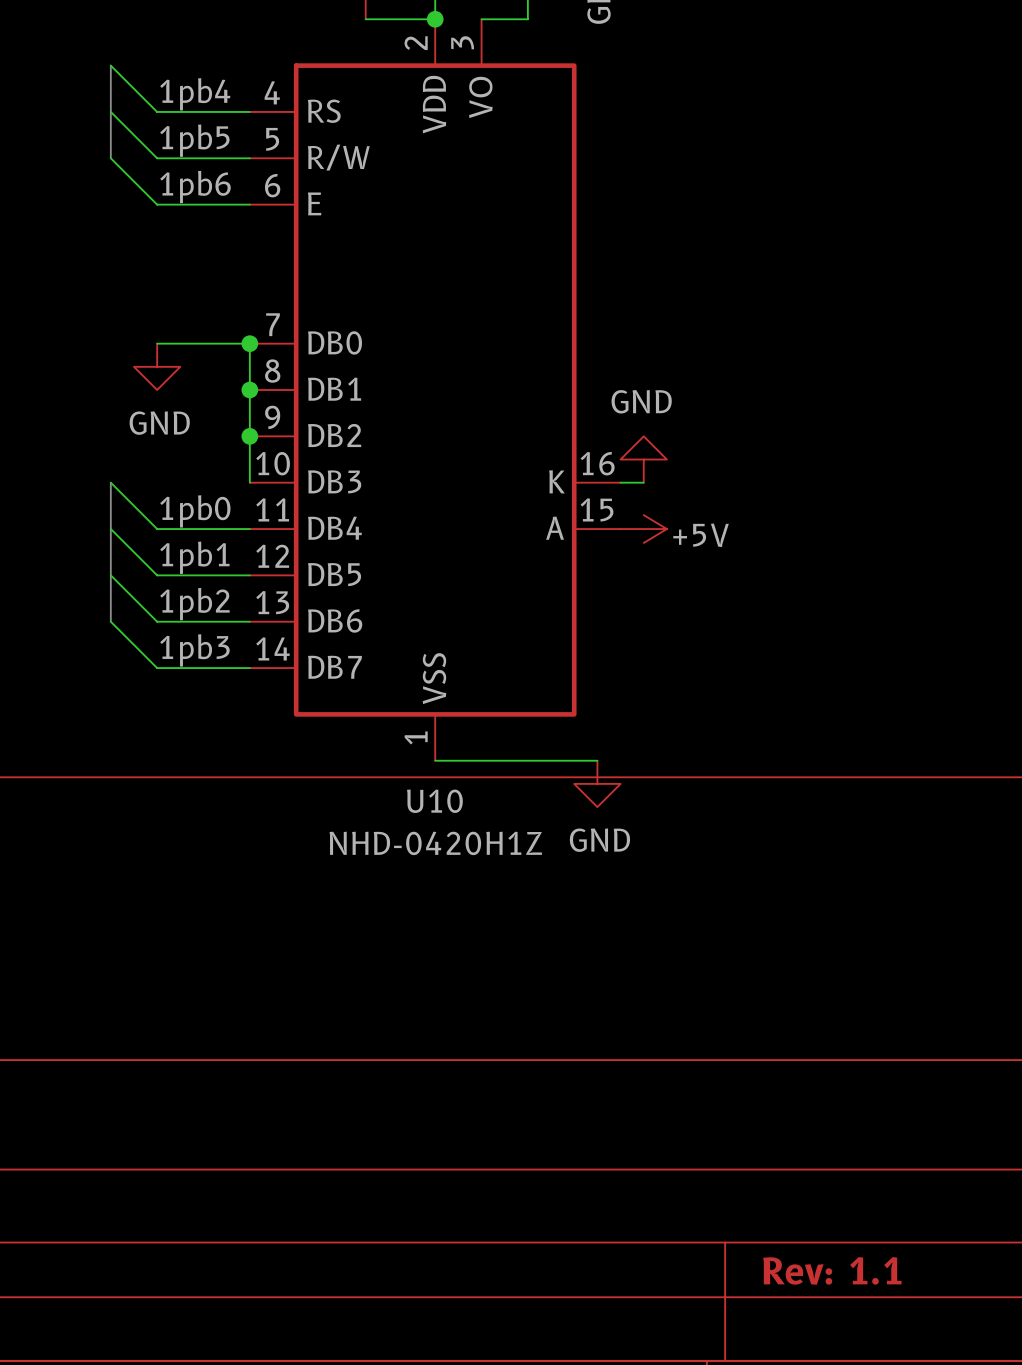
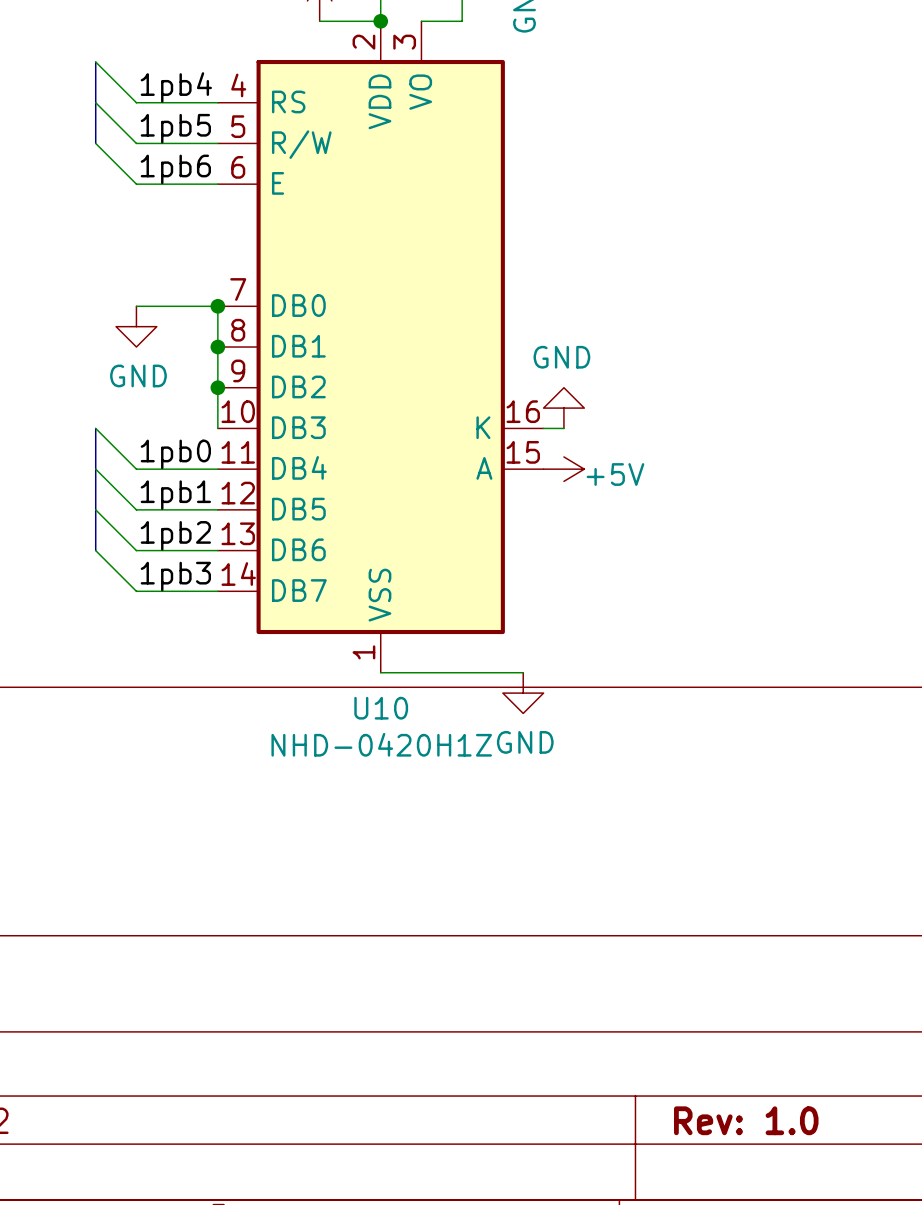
title block: Rev: 1.1 (832, 1270) -> Rev: 1.0 (746, 1120)

